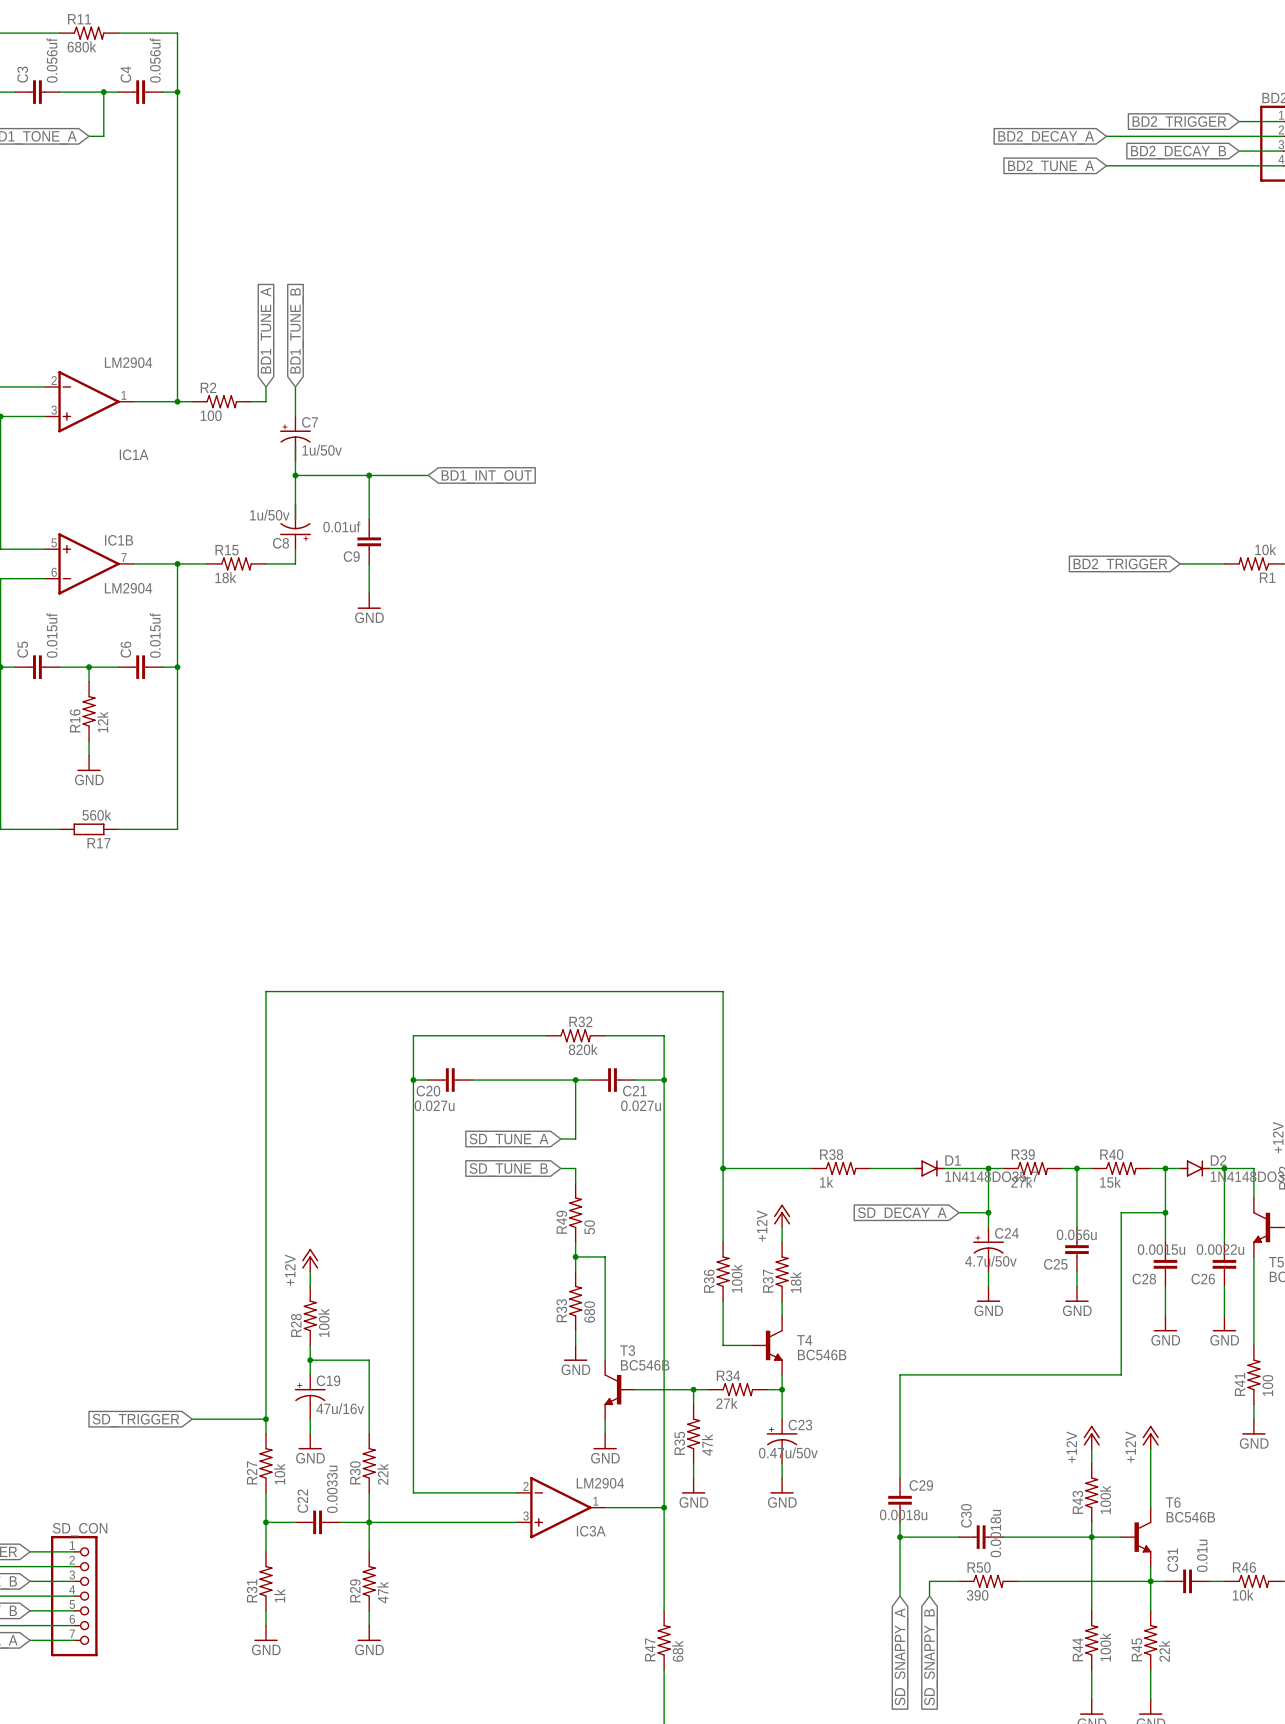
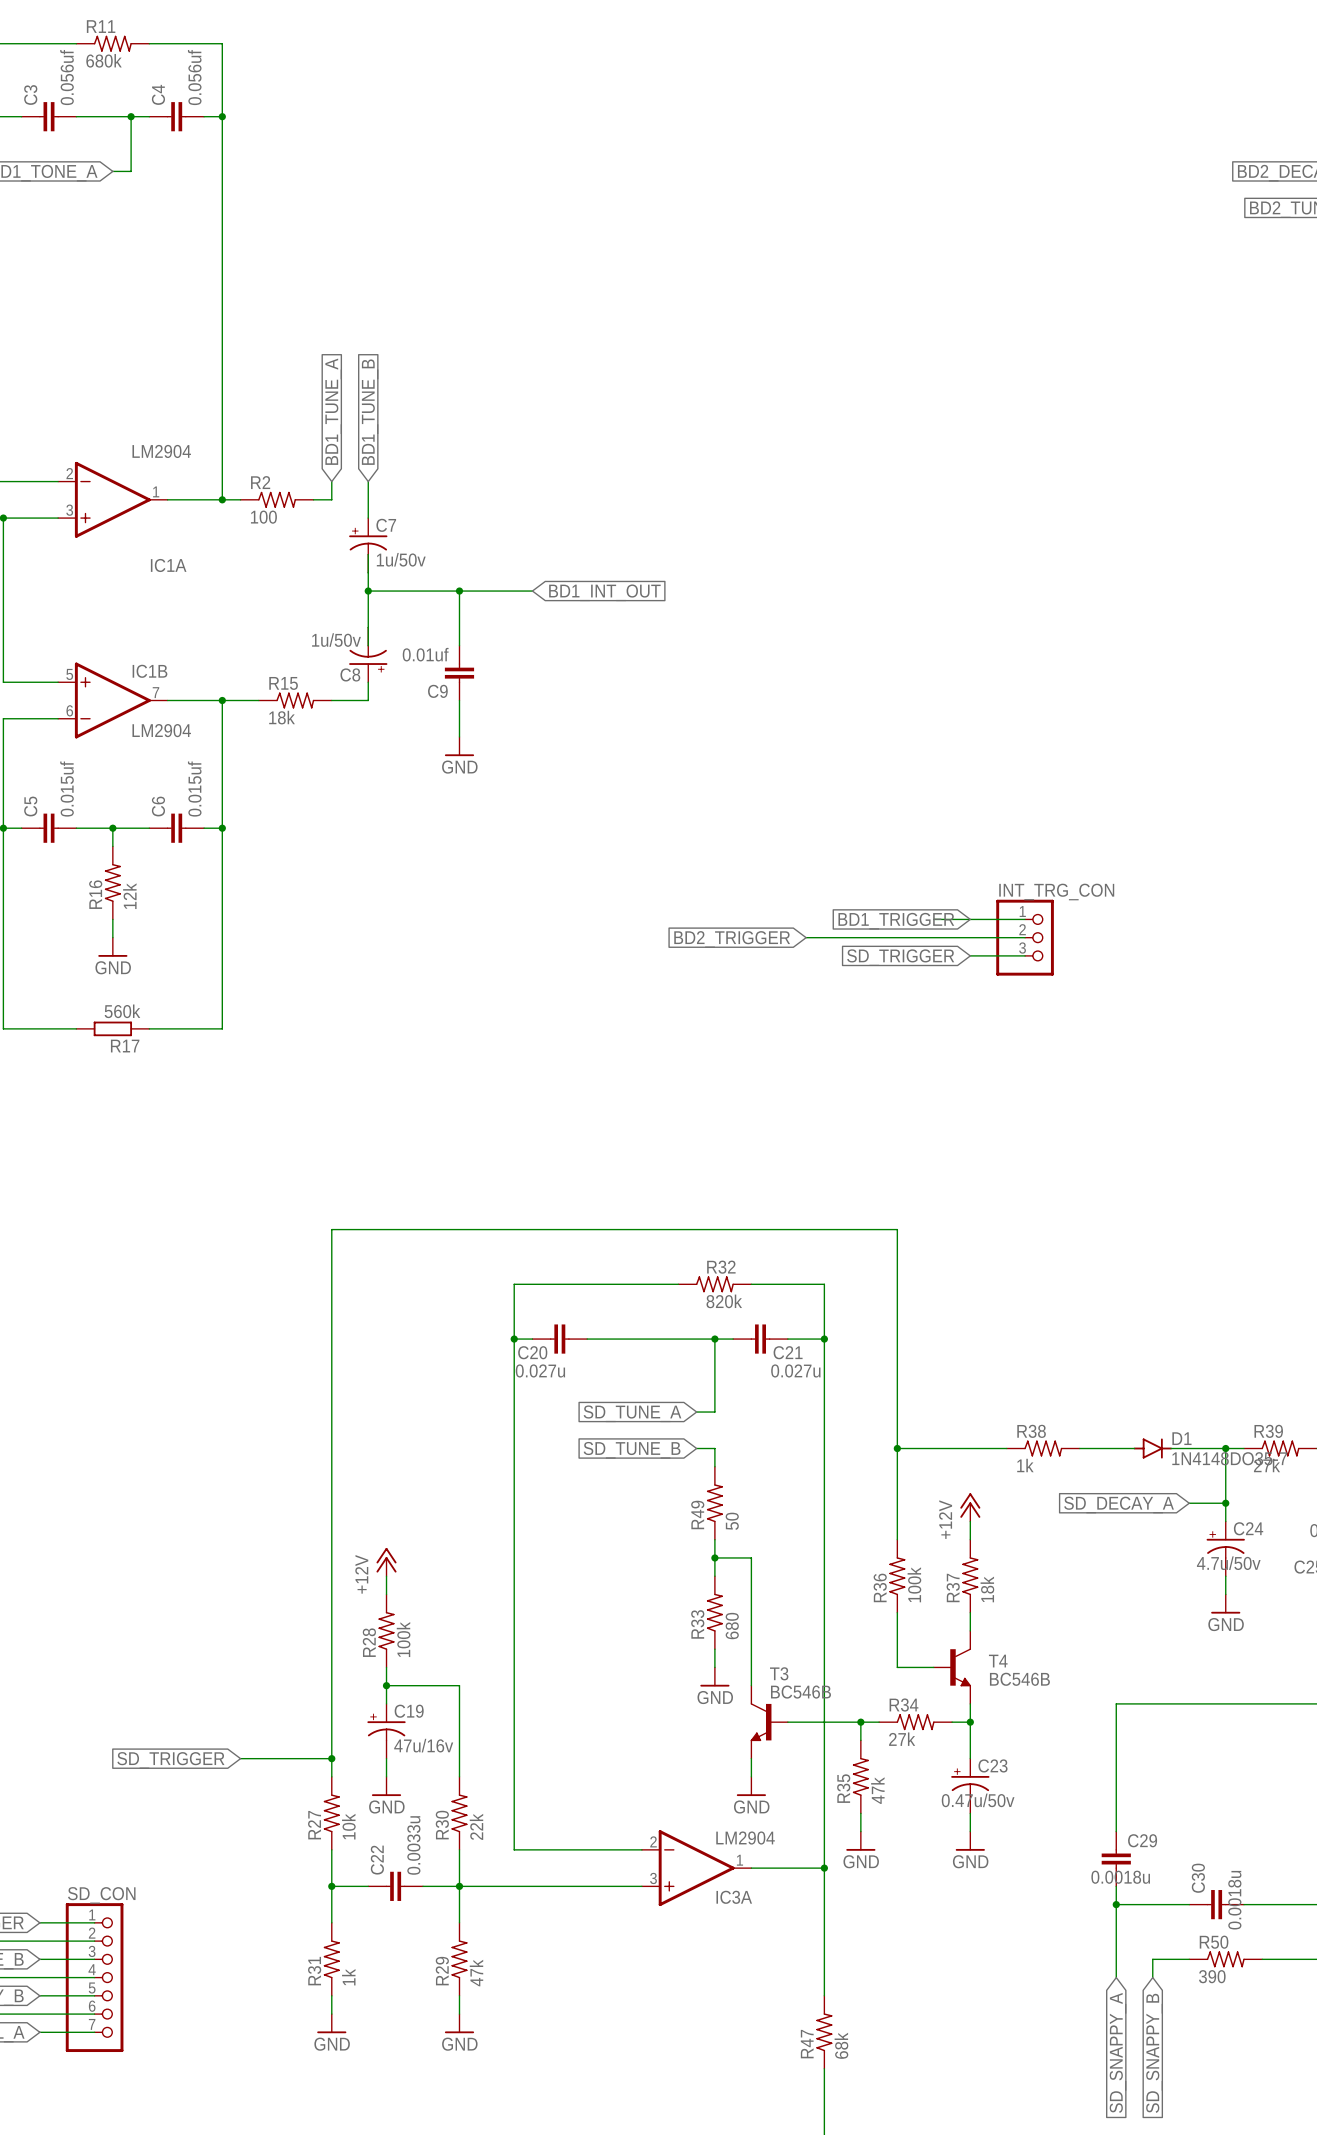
wire: none -> (933, 919) (1025, 919)
global label: none -> BD1_TRIGGER (896, 921)
wire: none -> (806, 937) (1025, 937)
INT_TRG_CON: none -> (1025, 937)
global label: none -> BD2_TRIGGER (732, 939)
wire: none -> (970, 955) (1025, 955)
global label: none -> SD_TRIGGER (900, 957)

